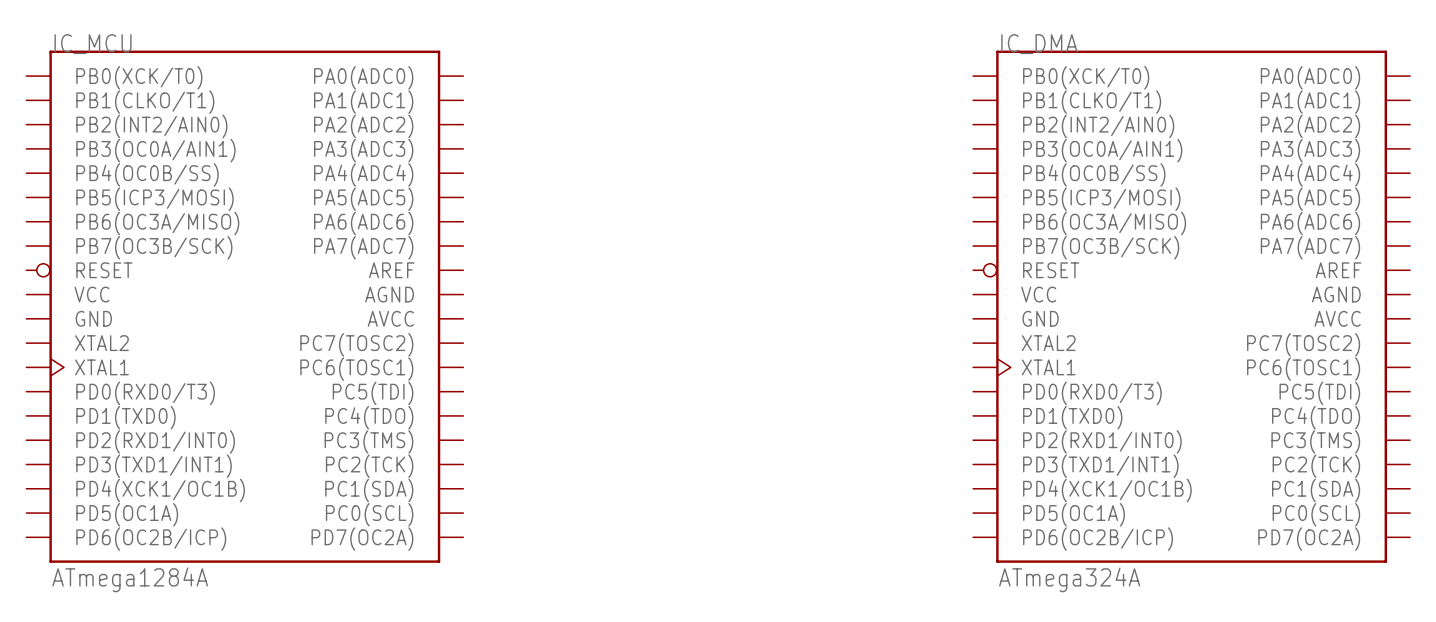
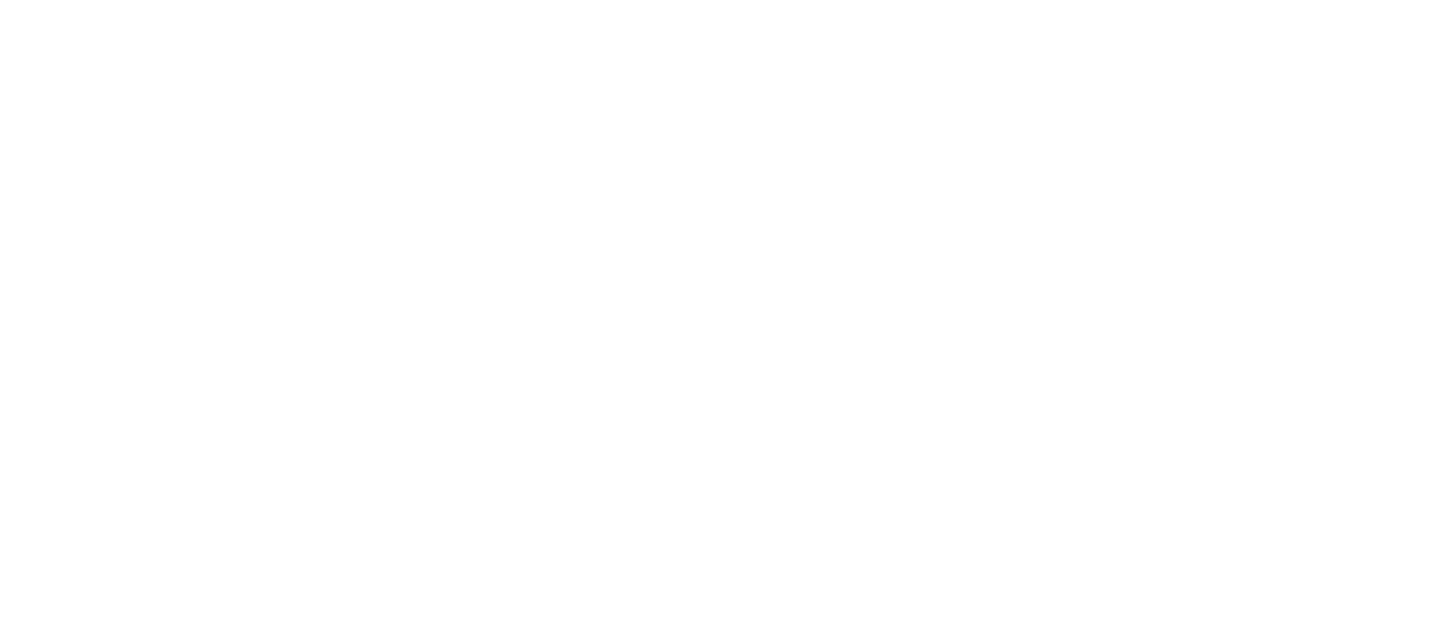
IC_MCU: ATmega1284A (244, 306) -> none
IC_DMA: ATmega324A (1191, 306) -> none

